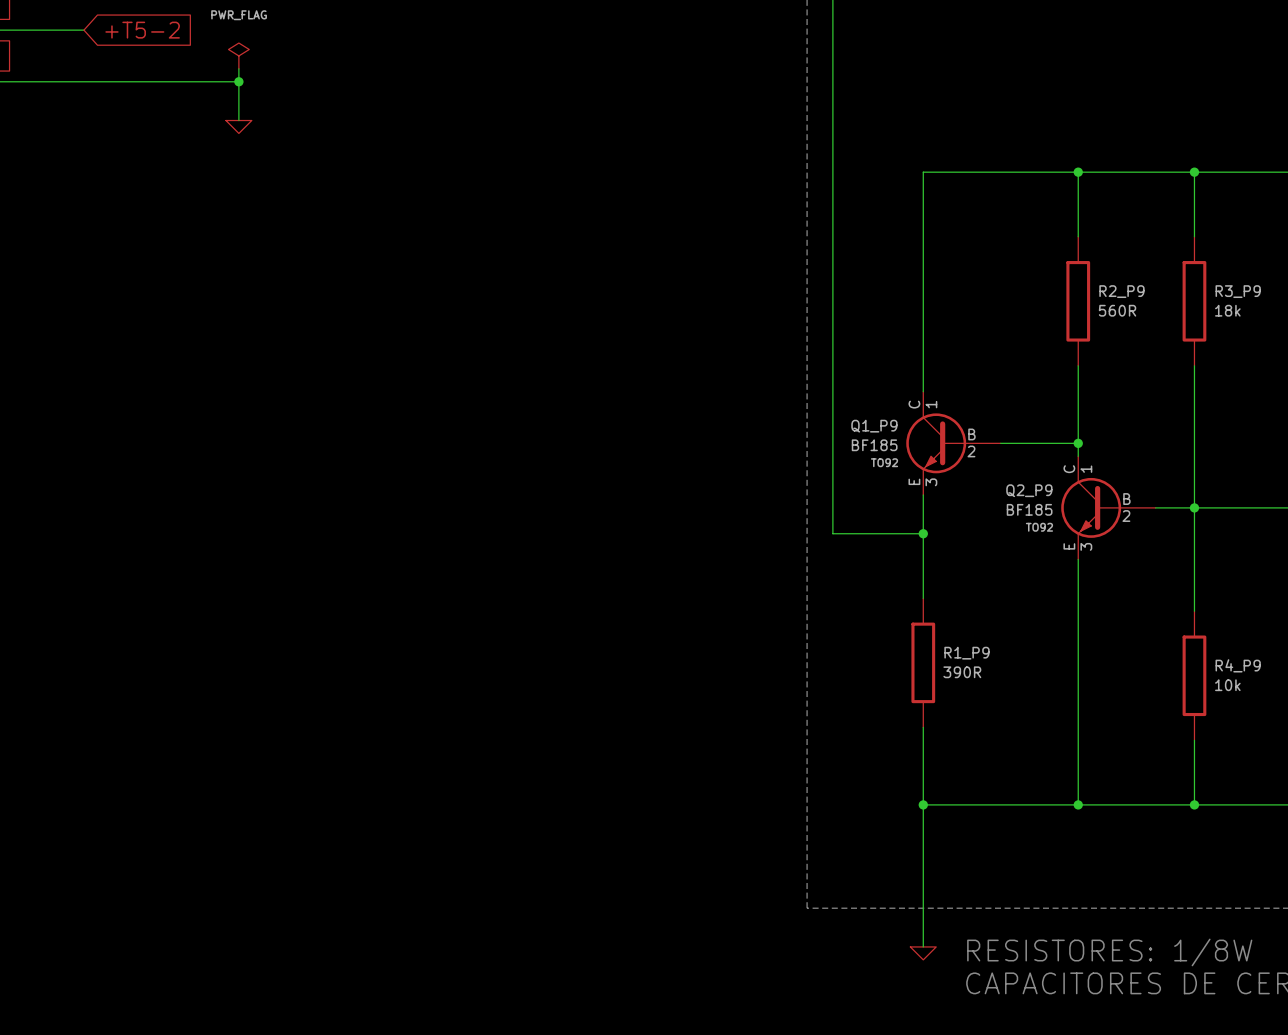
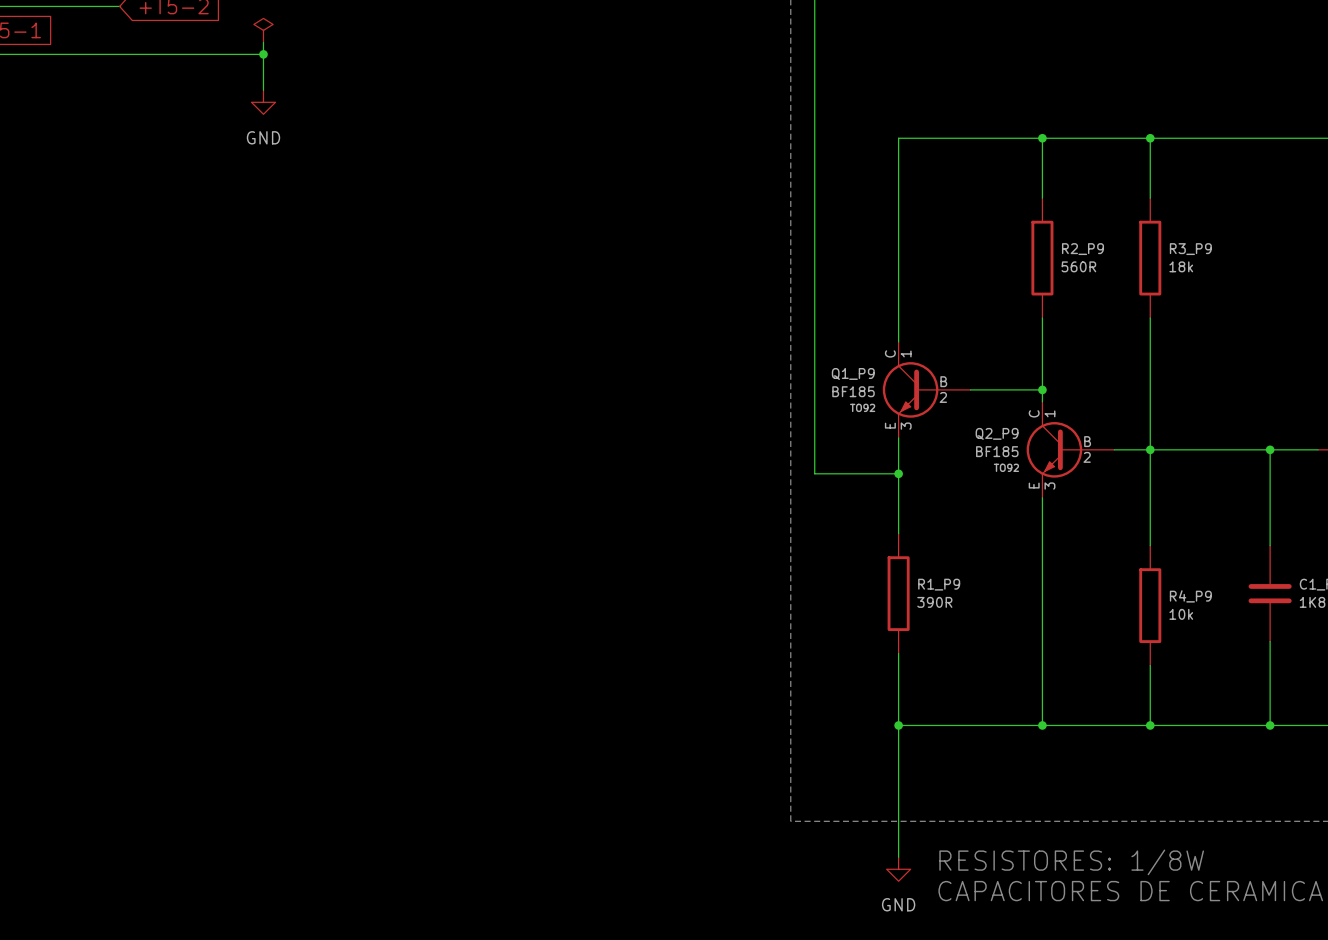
power symbol shape: [225, 120, 252, 134] -> [251, 90, 276, 115]
power symbol text: none -> GND (263, 137)
power symbol shape: [910, 946, 937, 960] -> [886, 857, 911, 882]
power symbol text: none -> GND (898, 904)

